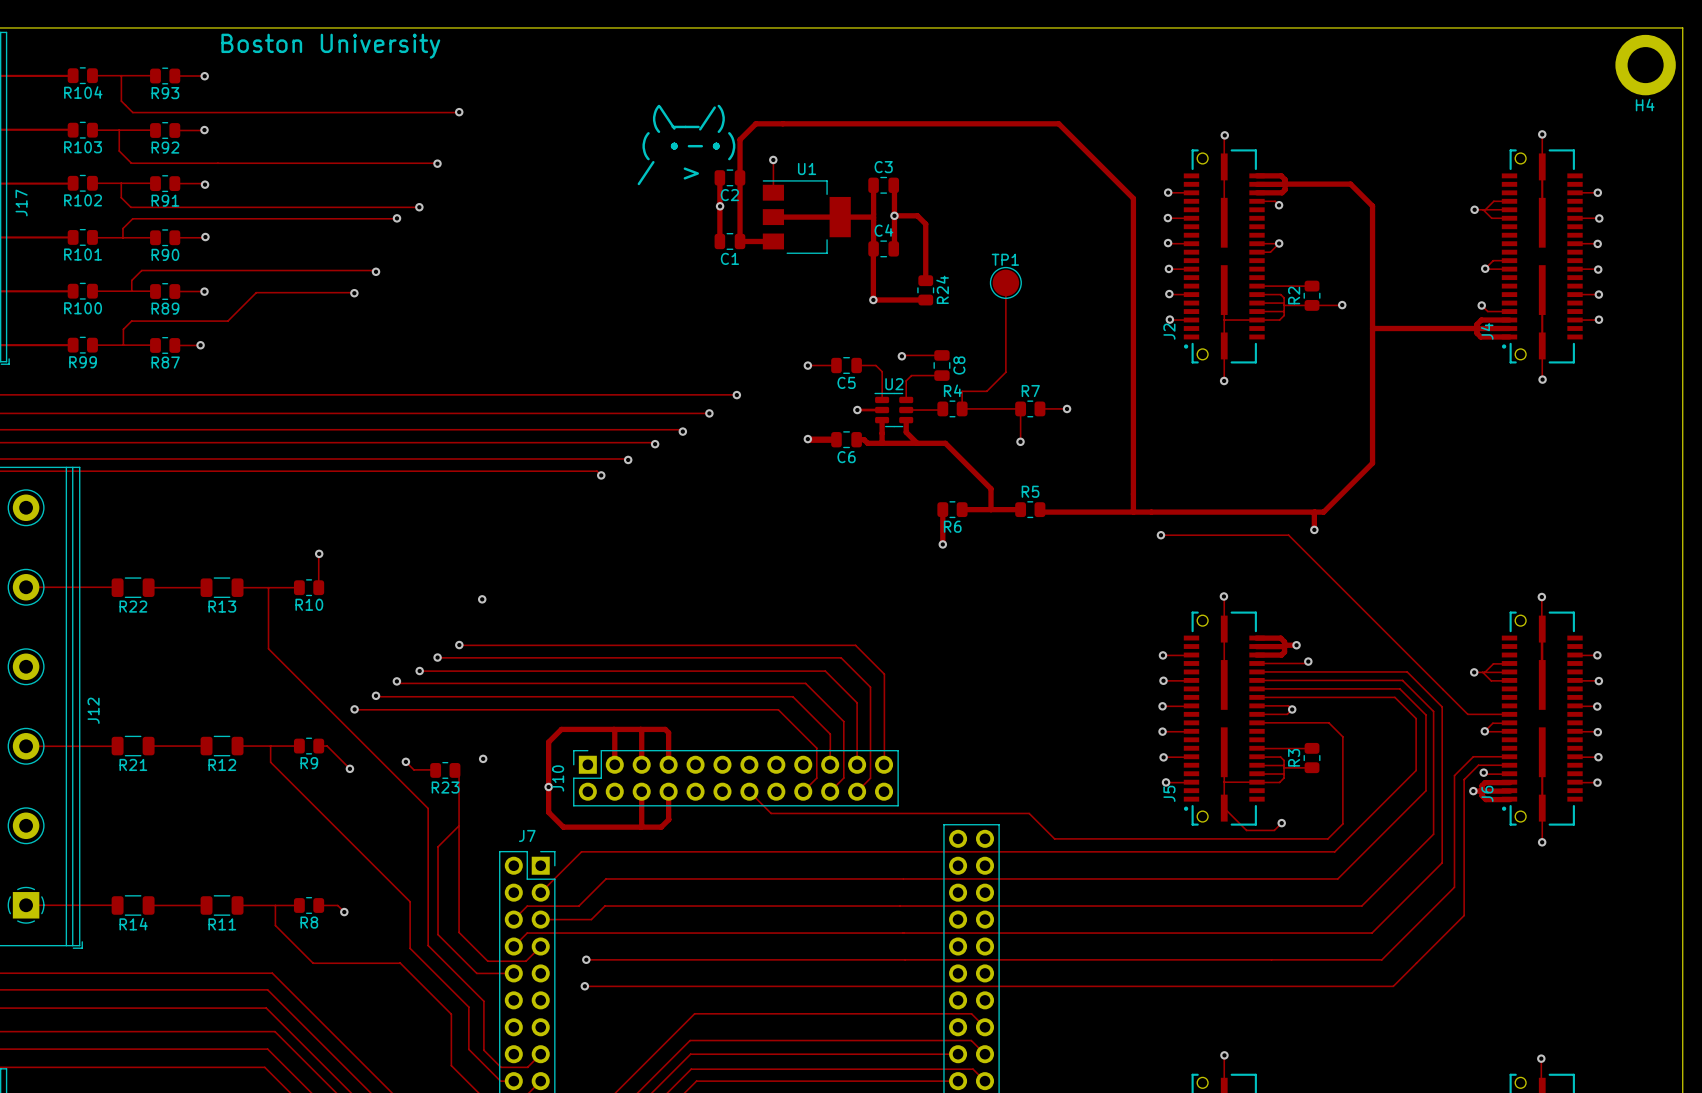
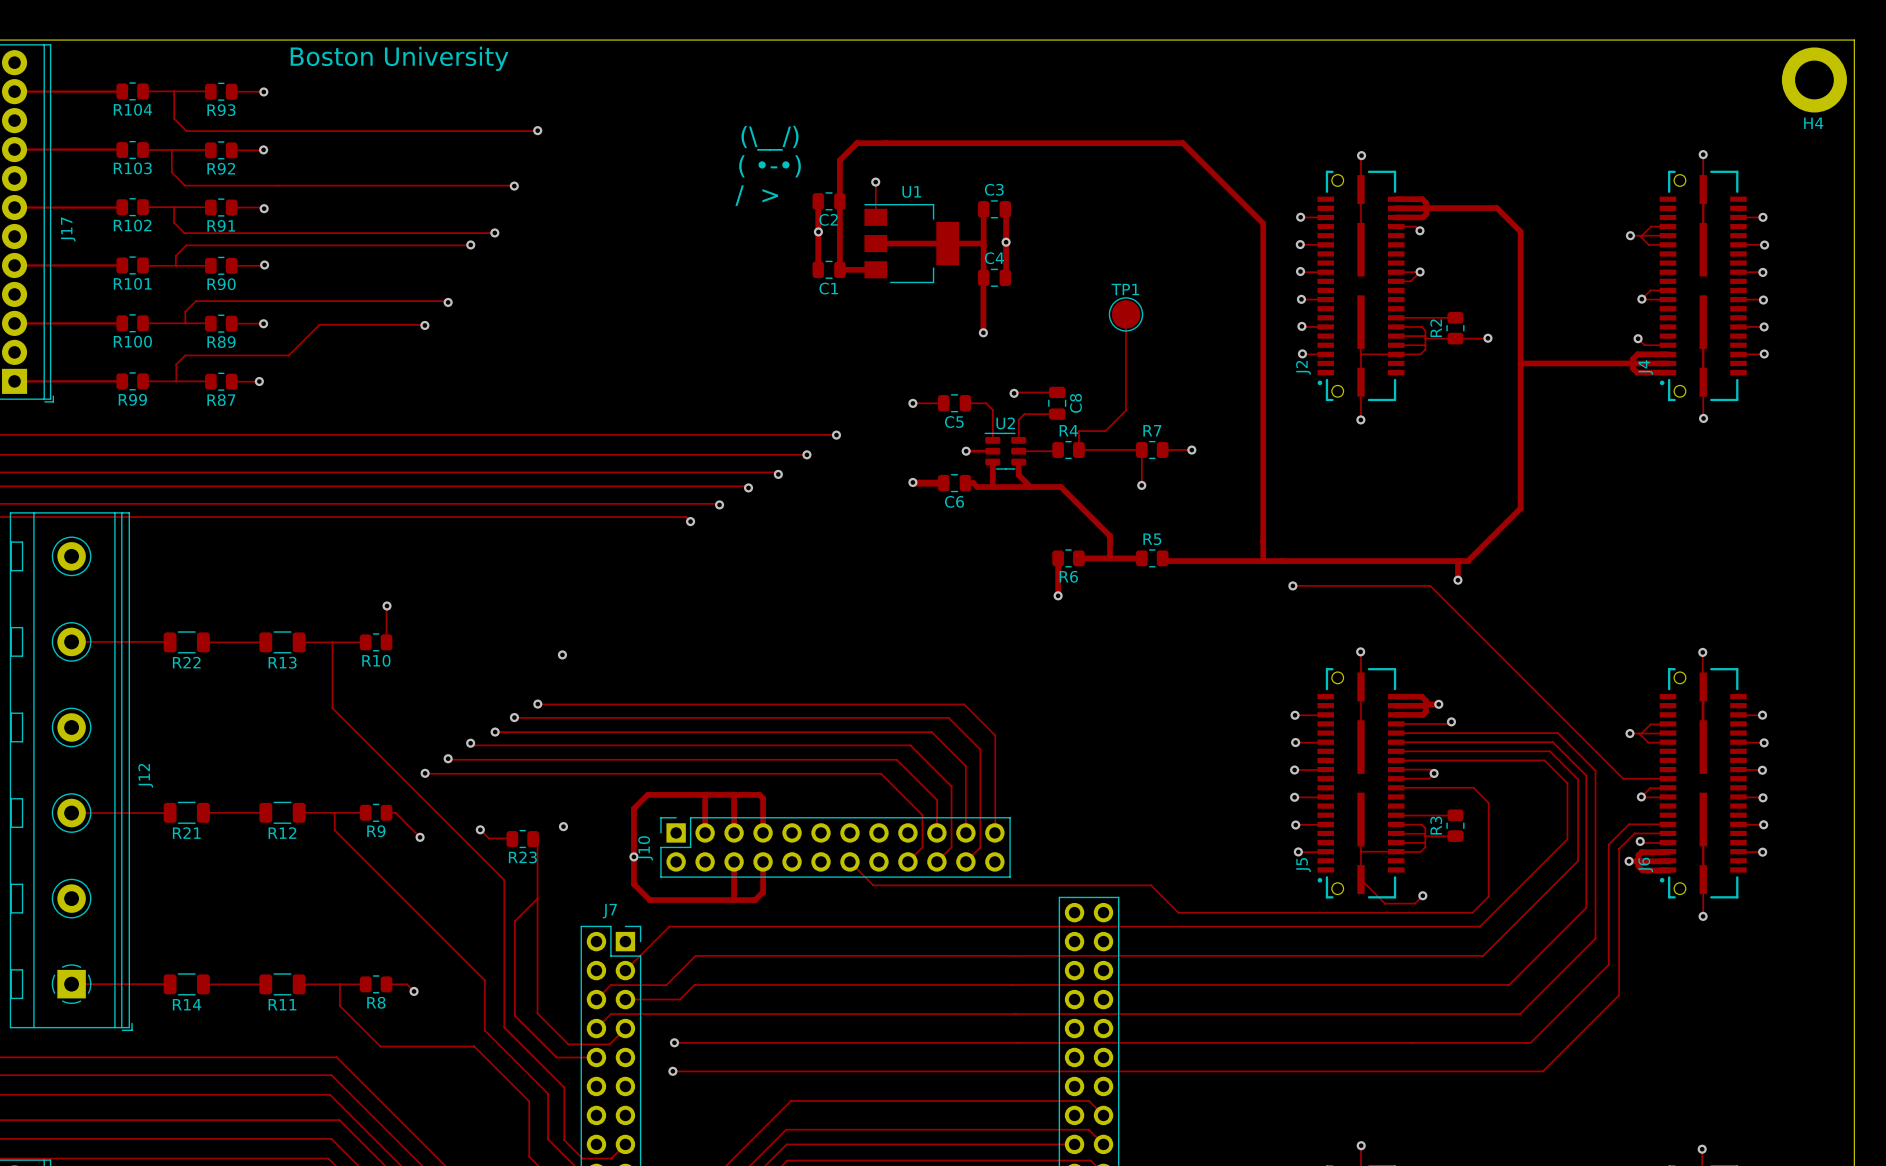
track: (894, 215) (917, 215) (925, 224) (925, 280) -> none
R24: (925, 290) -> none
track: (873, 299) (925, 299) -> none

